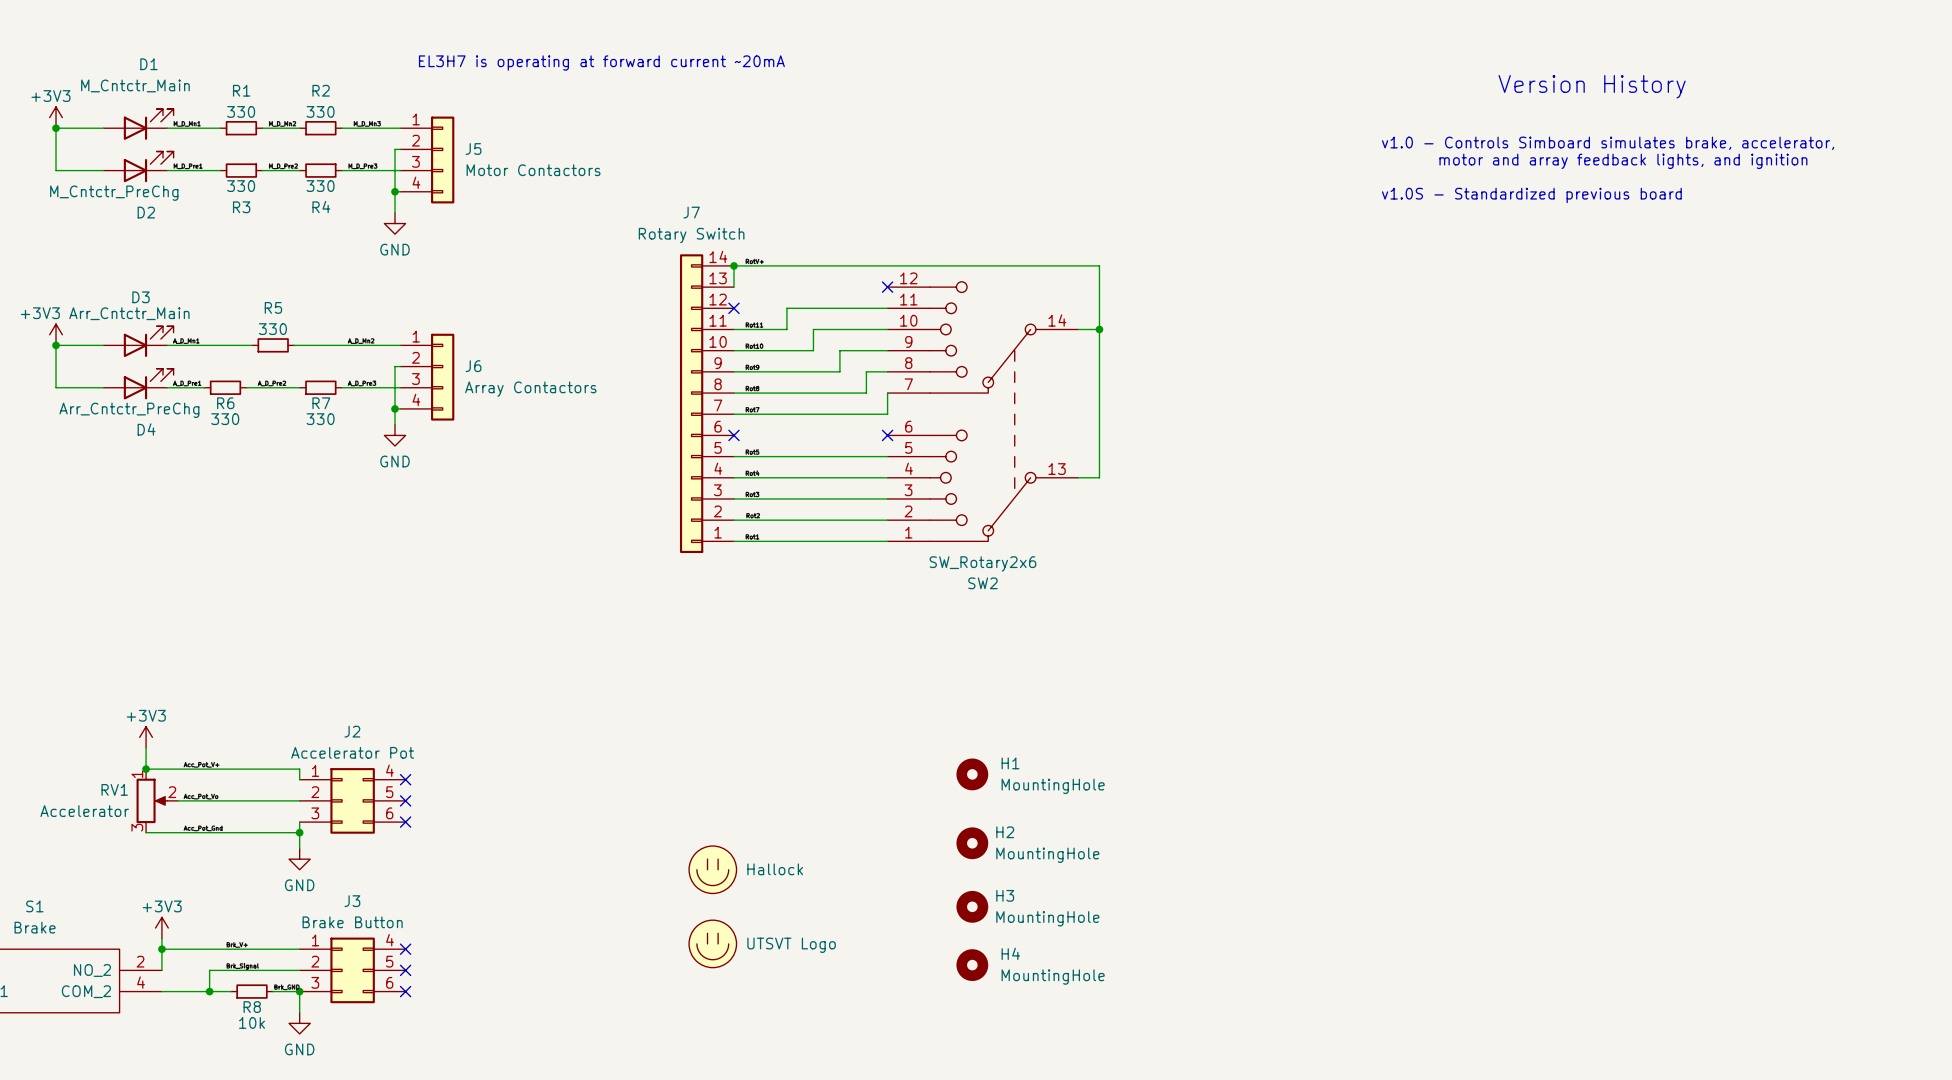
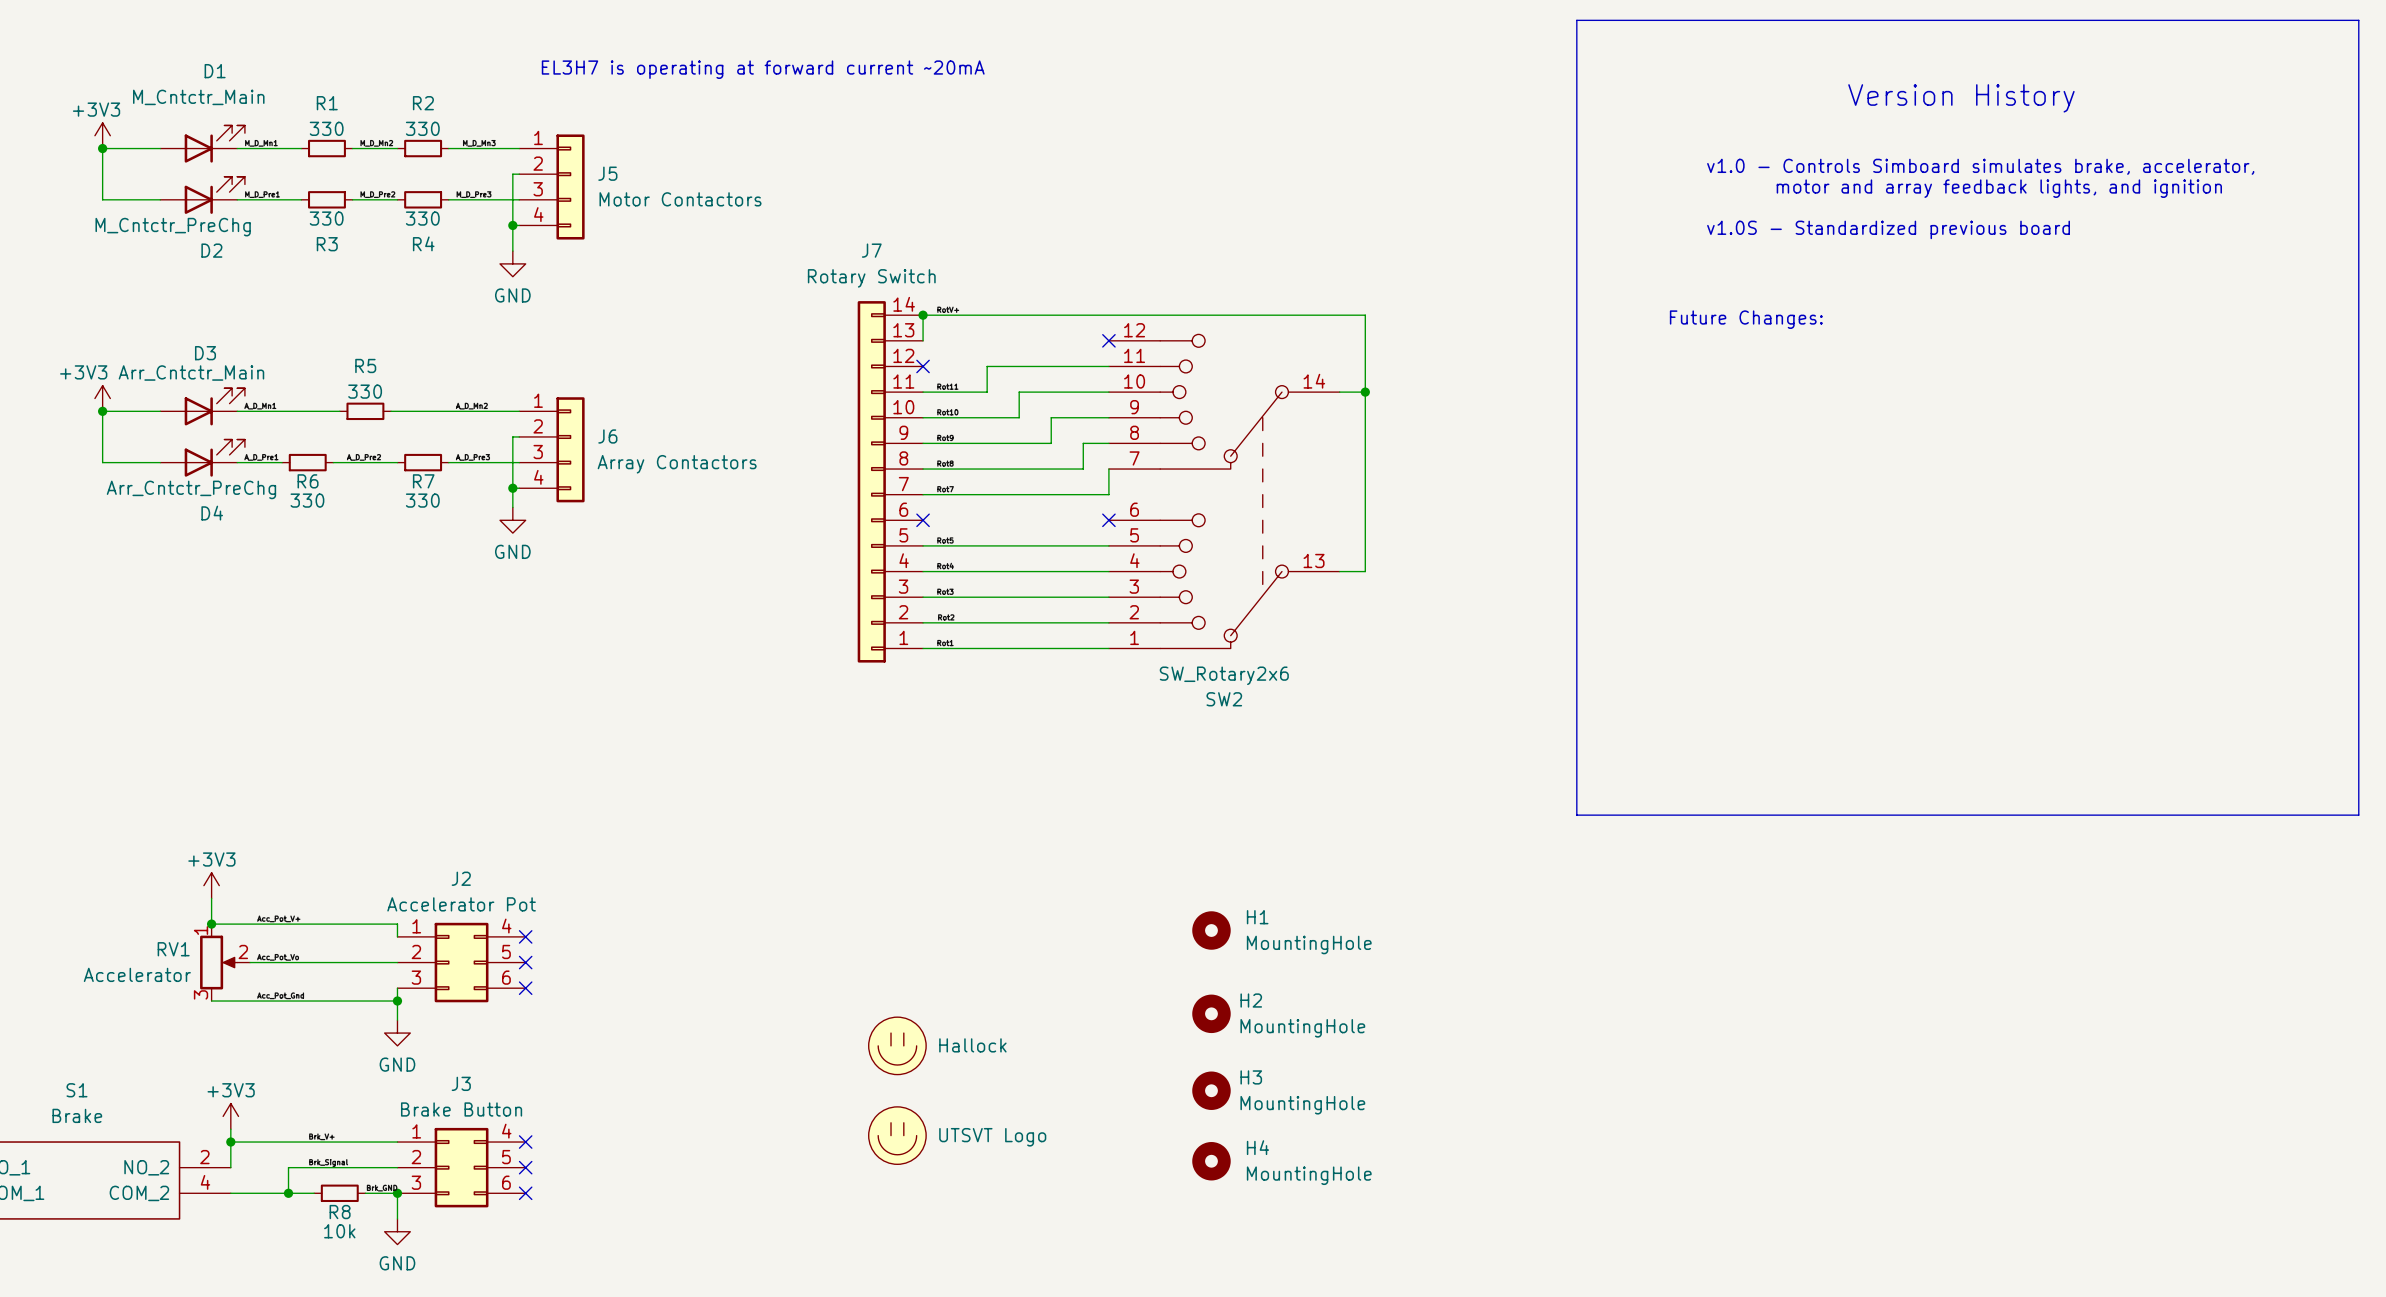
line: none -> (1576, 20) (1576, 815) (2358, 815) (2358, 20) (1576, 20)
text: none -> Future Changes: (1746, 319)

